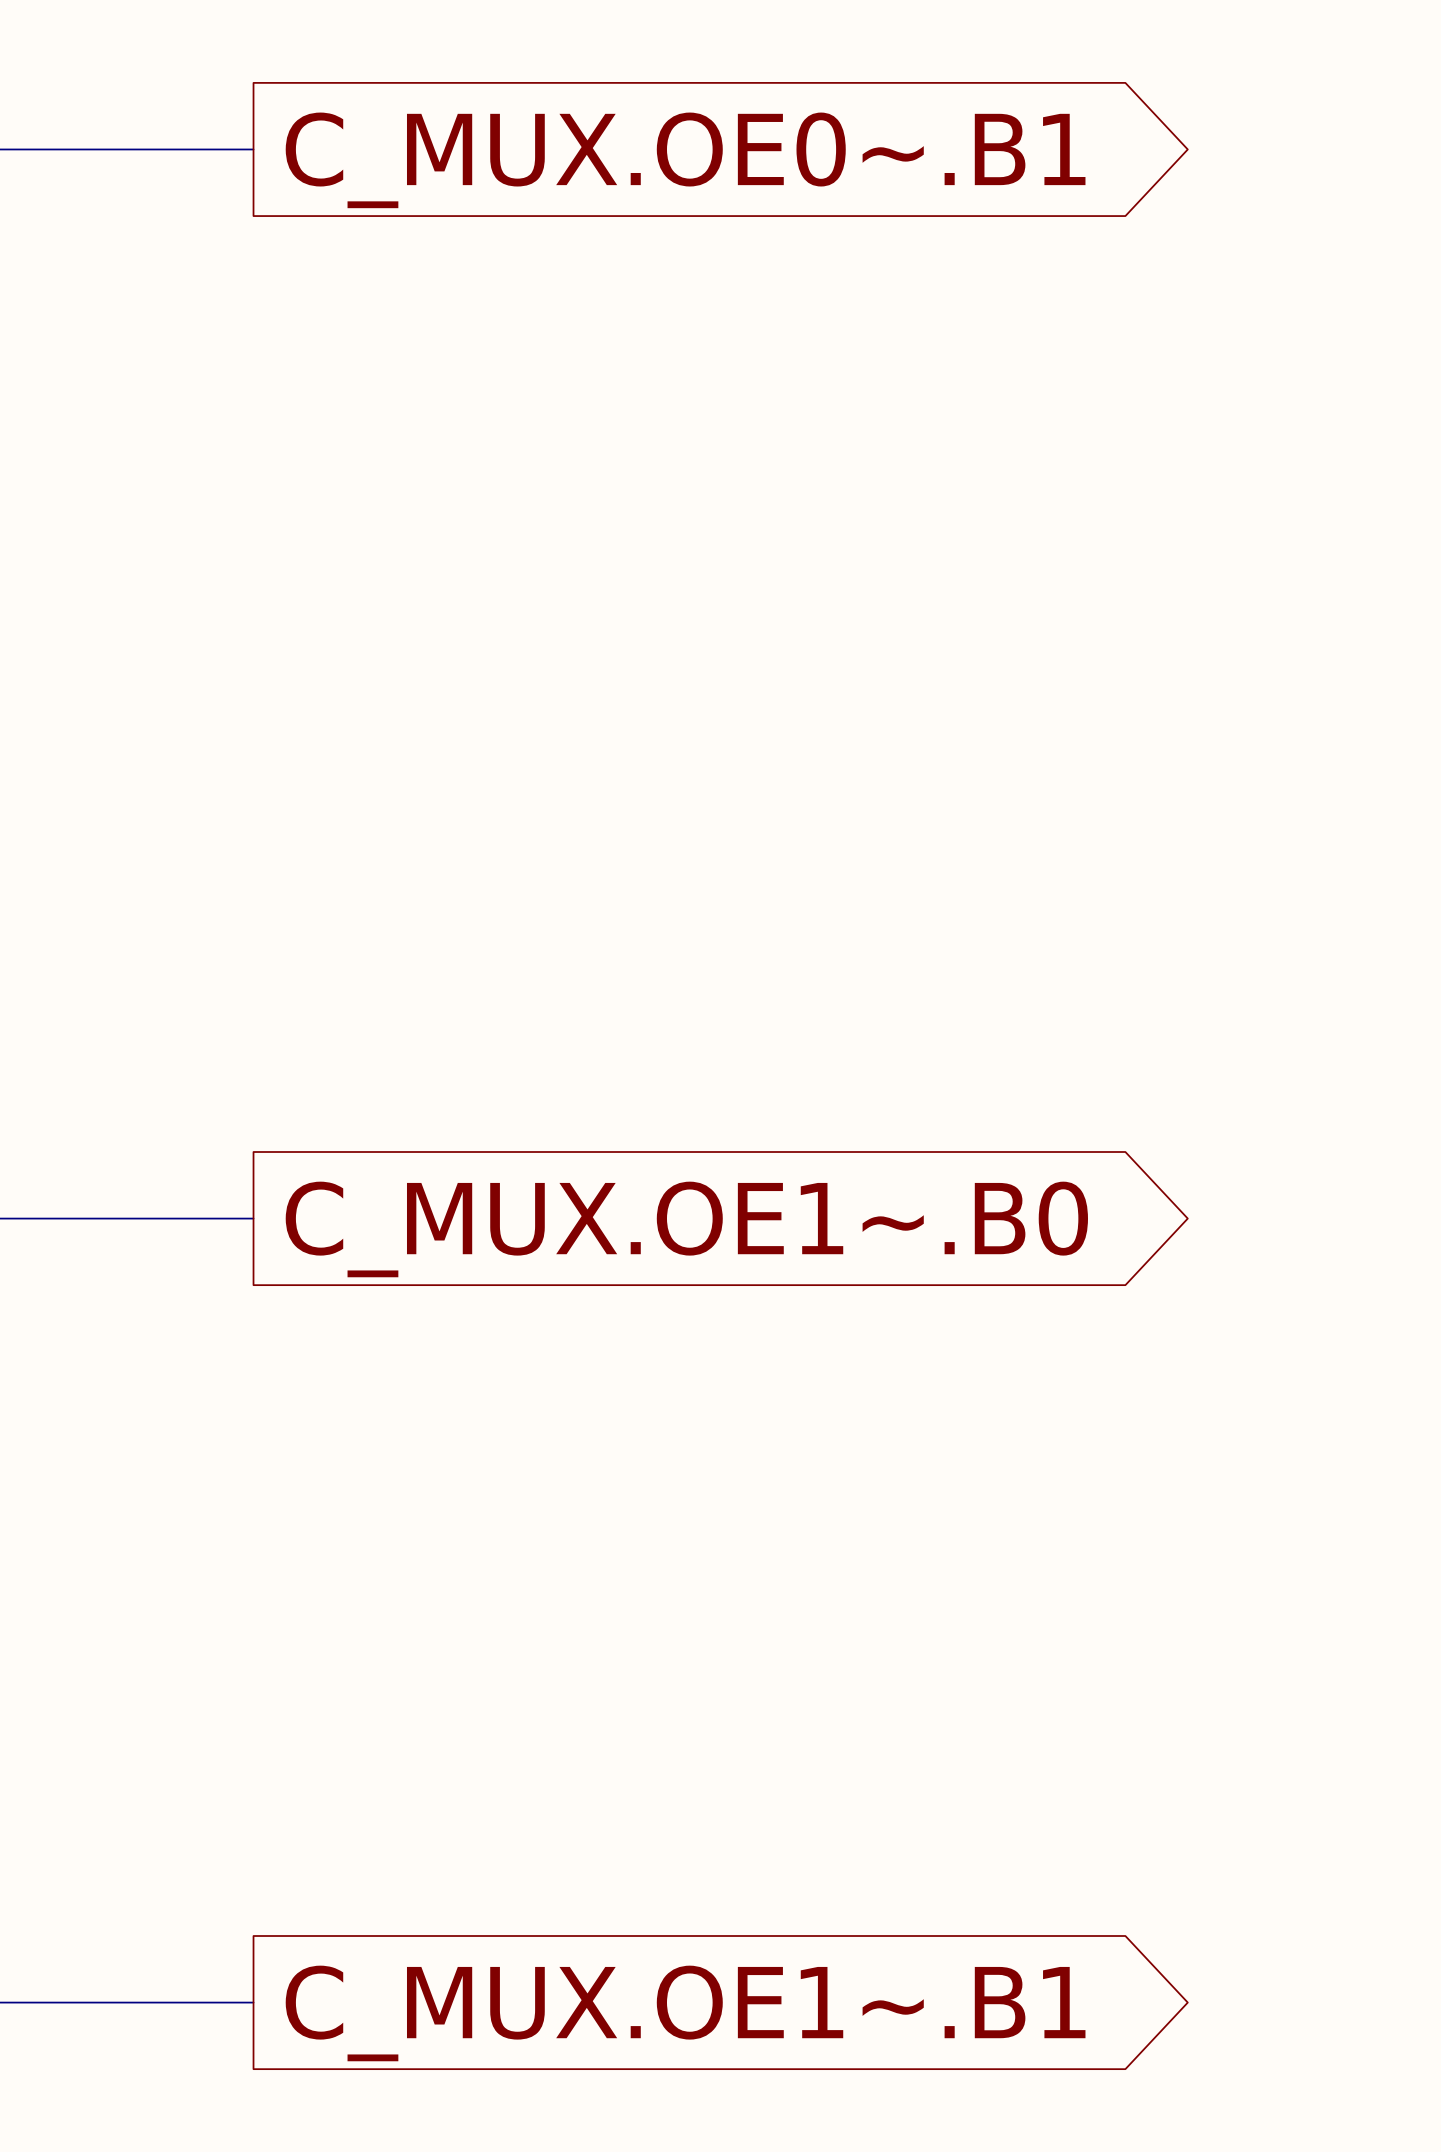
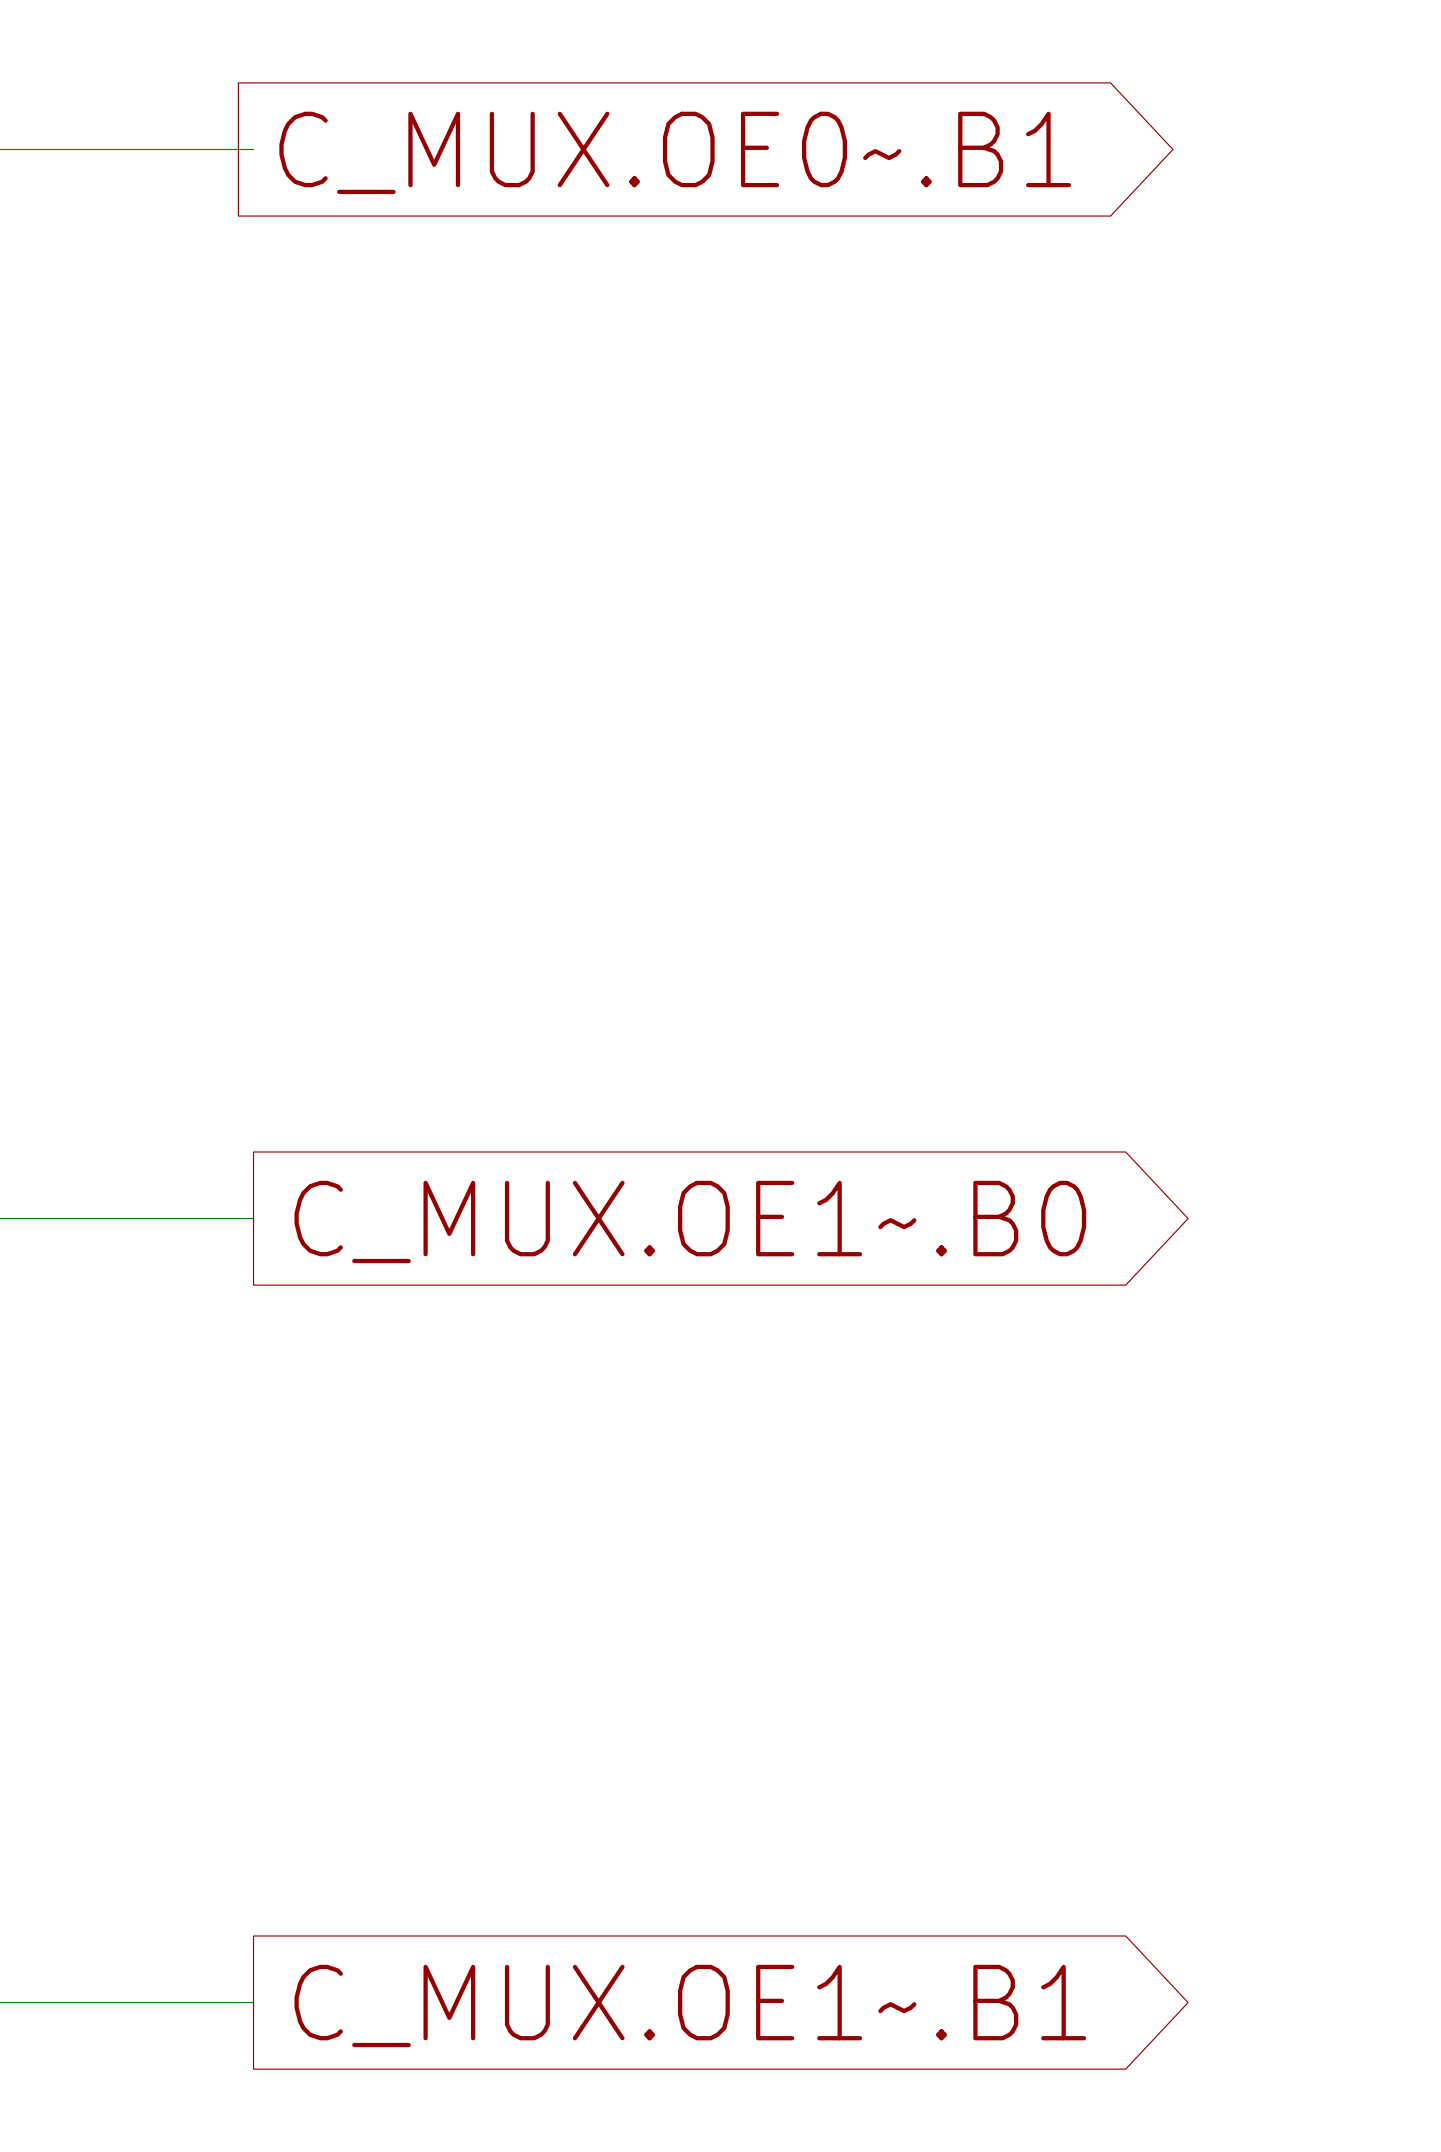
global label position: C_MUX.OE0~.B1 (685, 160) -> C_MUX.OE0~.B1 (675, 152)

